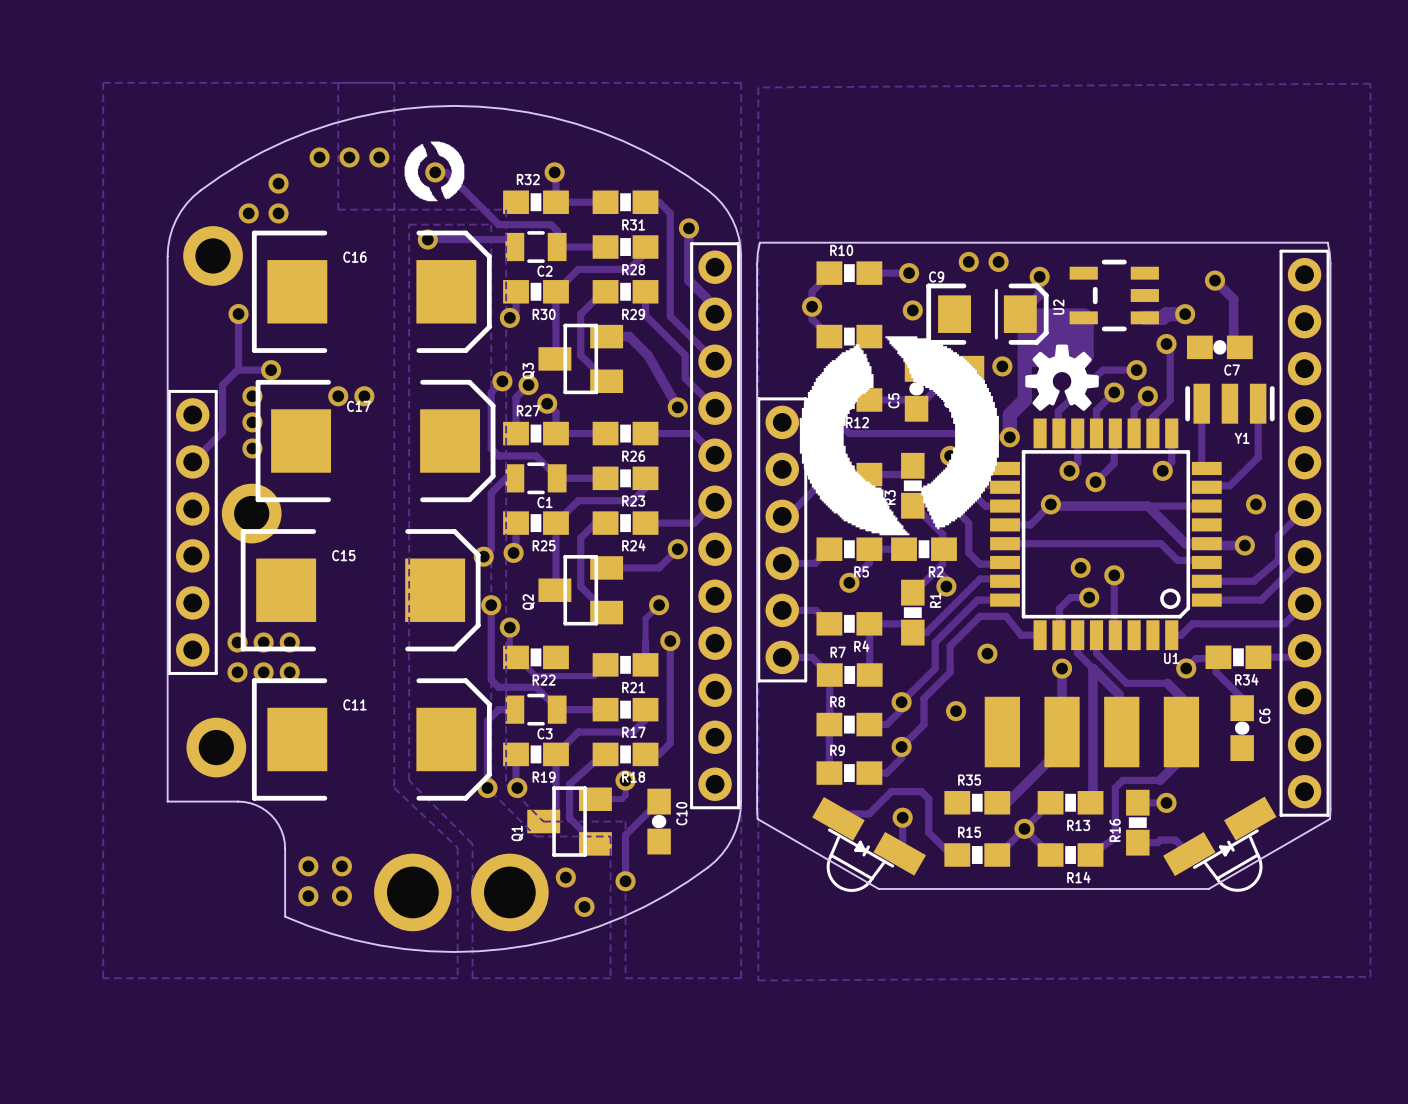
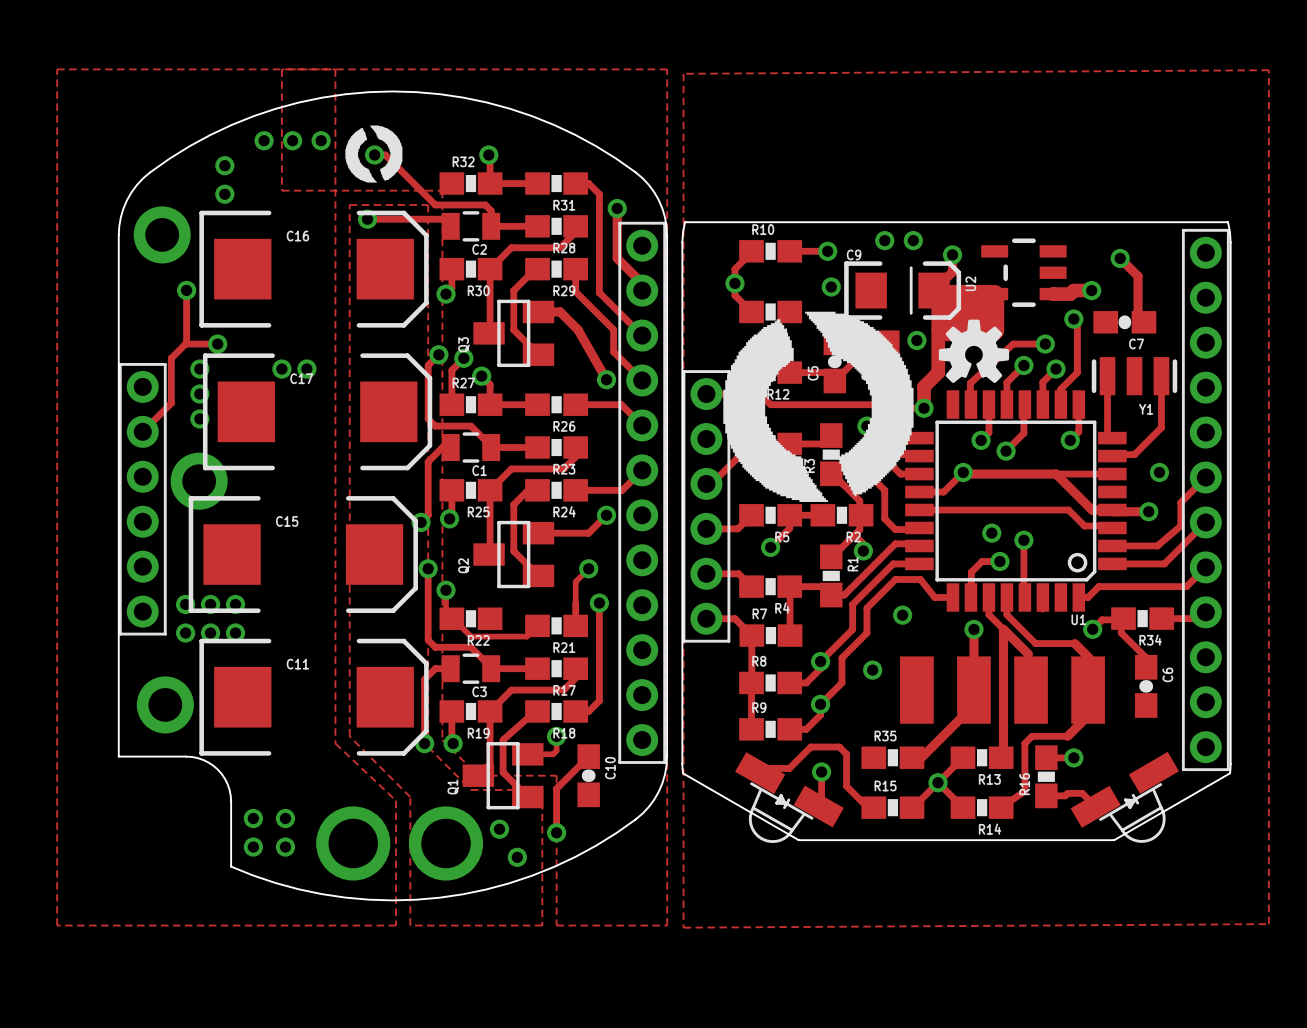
via: (248, 213) -> none

